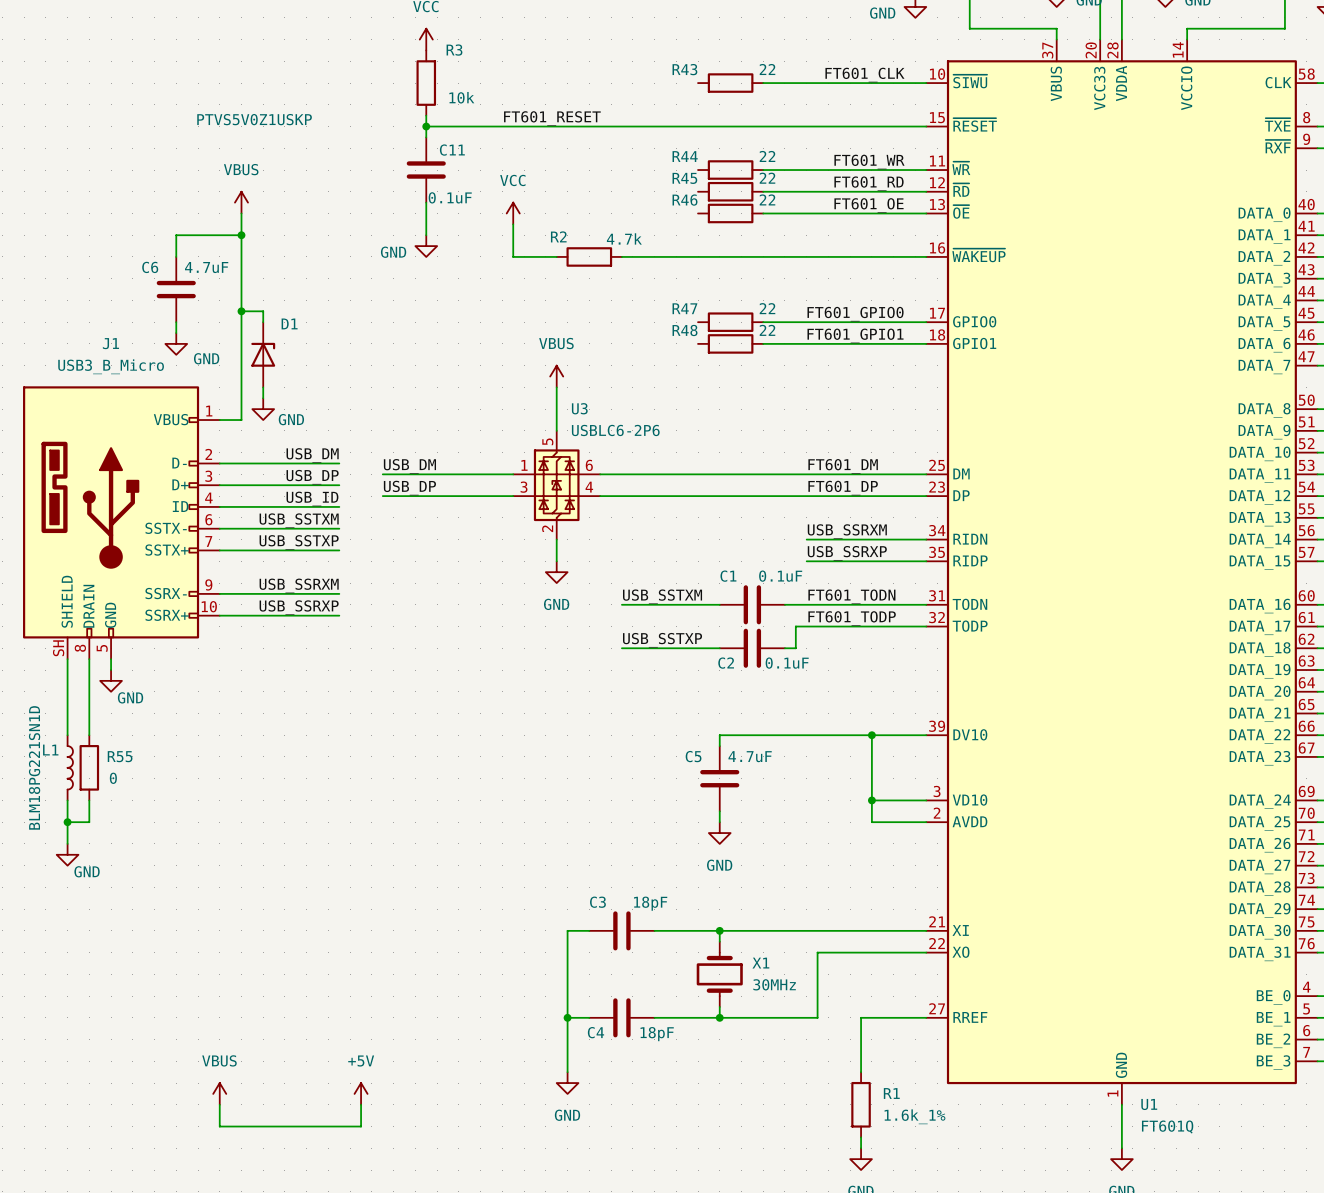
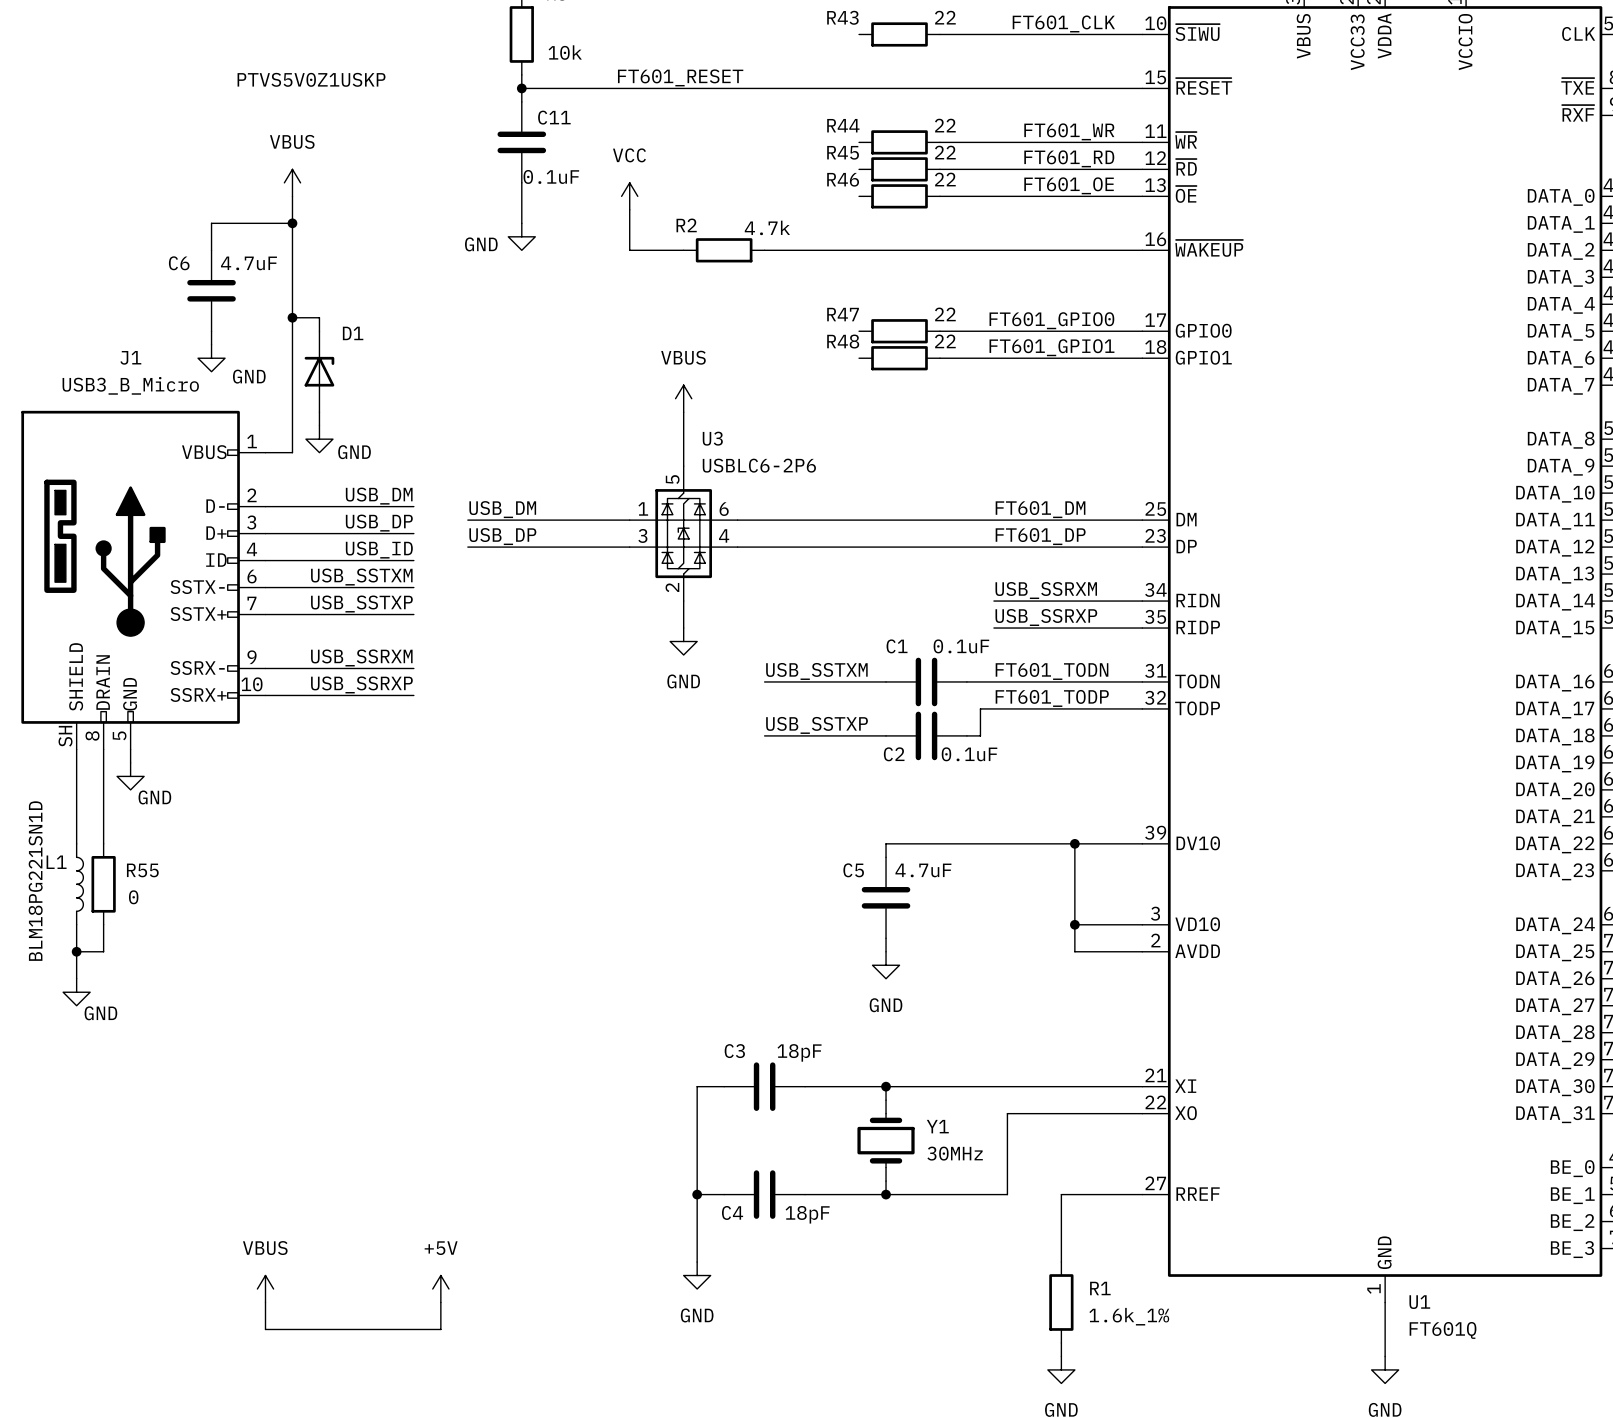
X1 name: X1 (760, 963) -> Y1 (937, 1126)

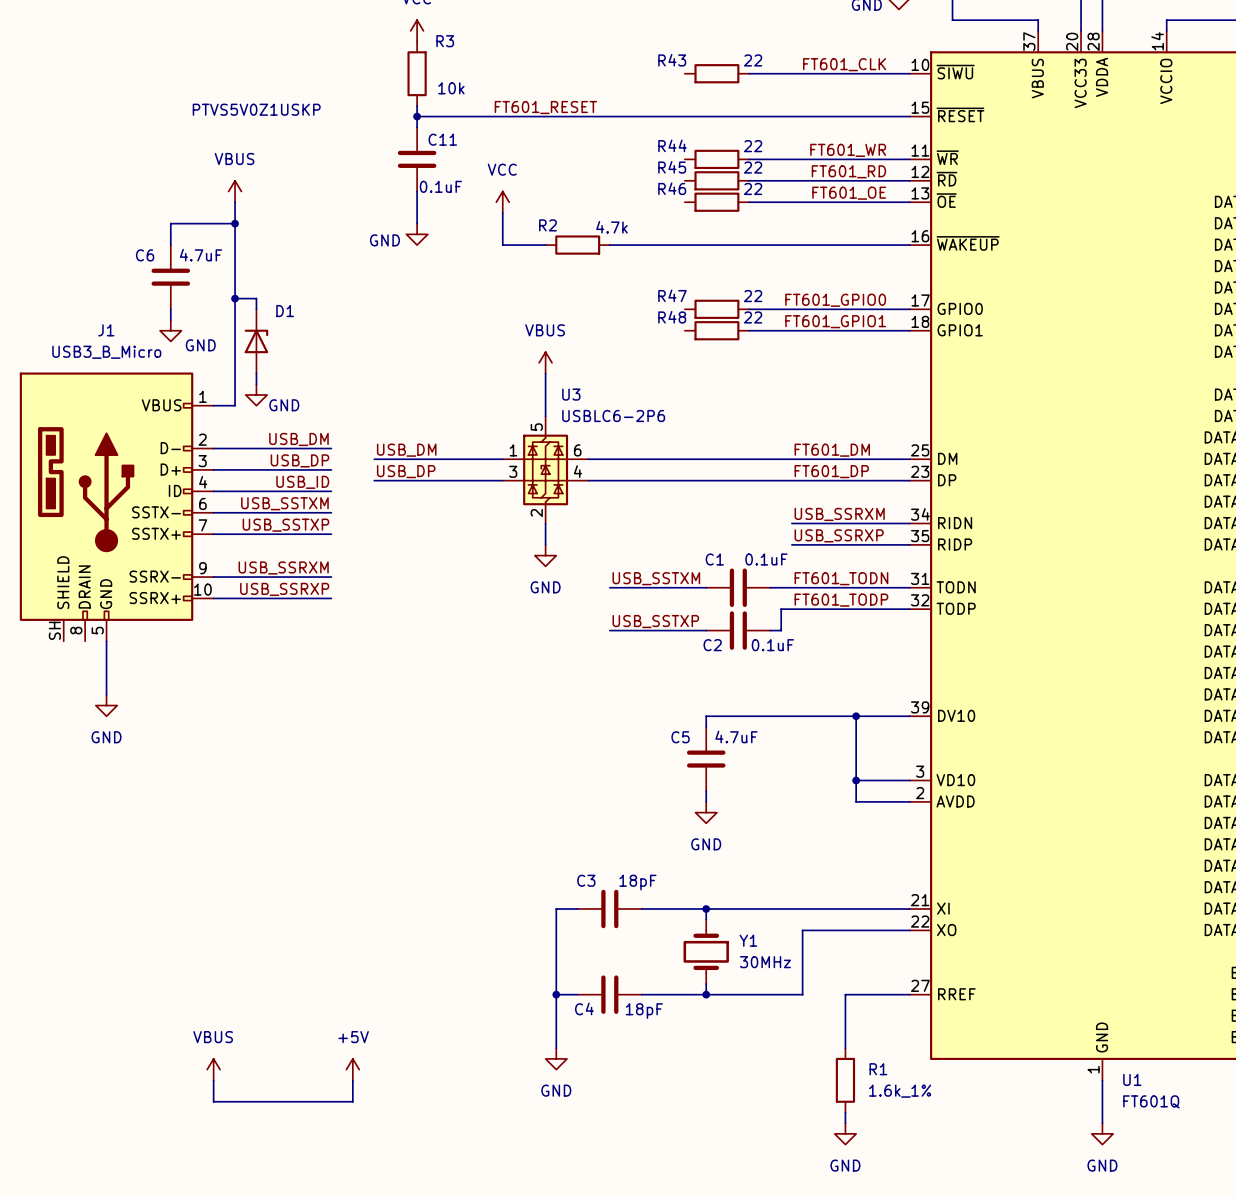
wire: (76, 749) (76, 843) -> none
wire: (103, 749) (103, 843) -> none
power symbol position: GND (130, 776) -> GND (106, 705)
power symbol text position: GND (154, 797) -> GND (106, 737)
L1: BLM18PG221SN1D (80, 884) -> none
R55: 0 (103, 884) -> none
wire: (76, 924) (76, 978) -> (106, 651) (106, 694)
wire: (103, 924) (103, 951) (76, 951) -> none
junction: (76, 951) -> none
power symbol: GND (76, 992) -> none

